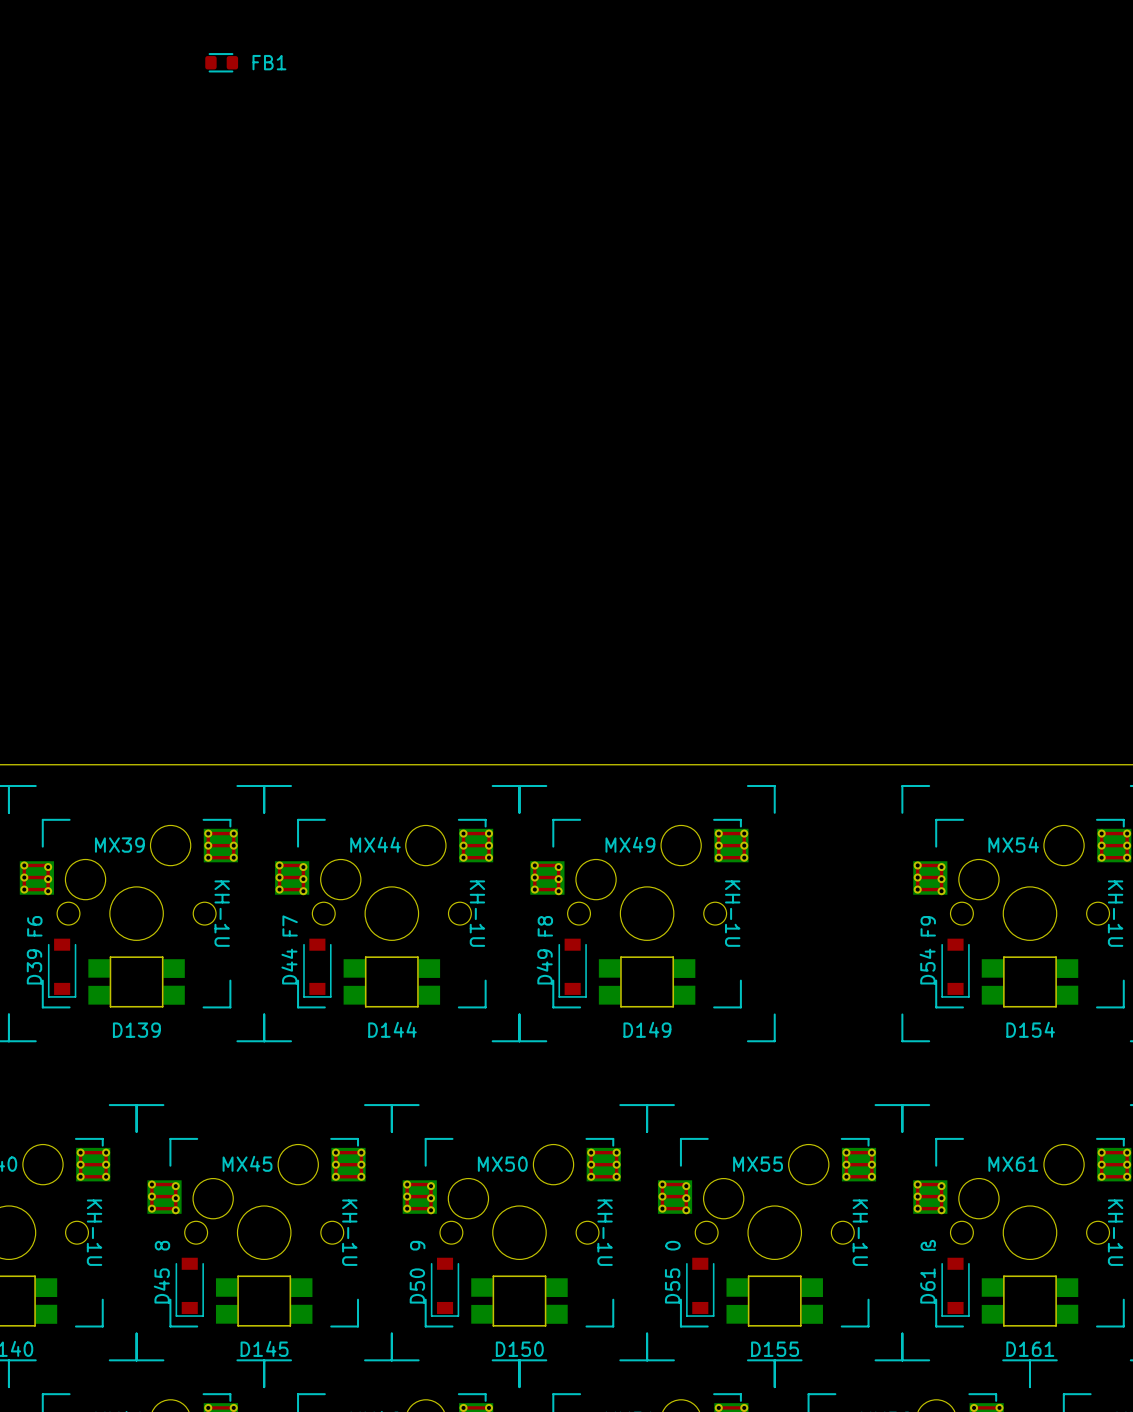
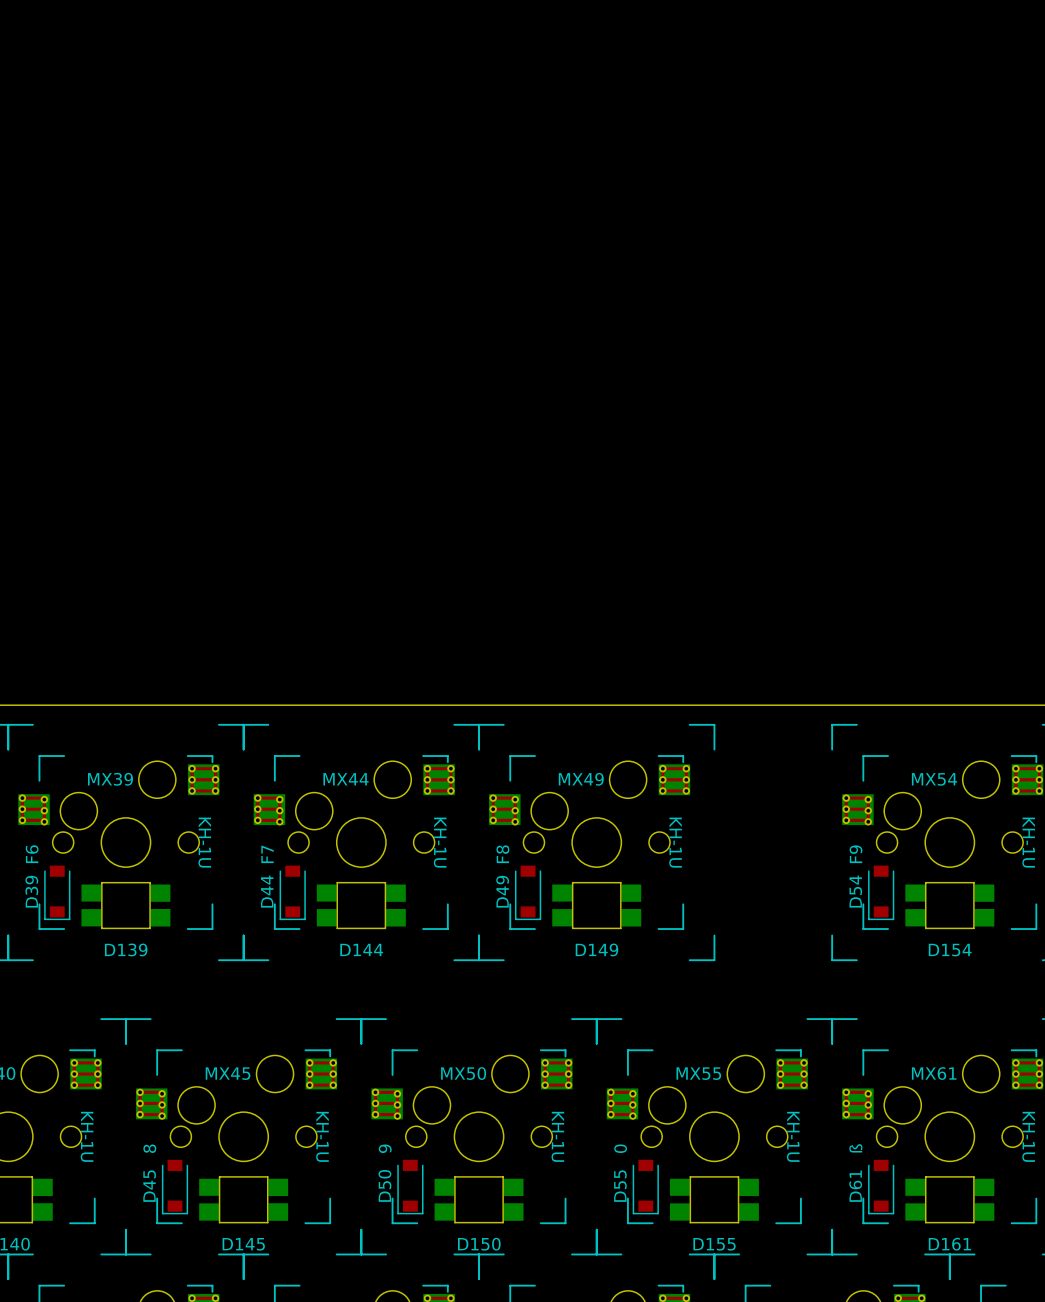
FB1: (221, 62) -> none

